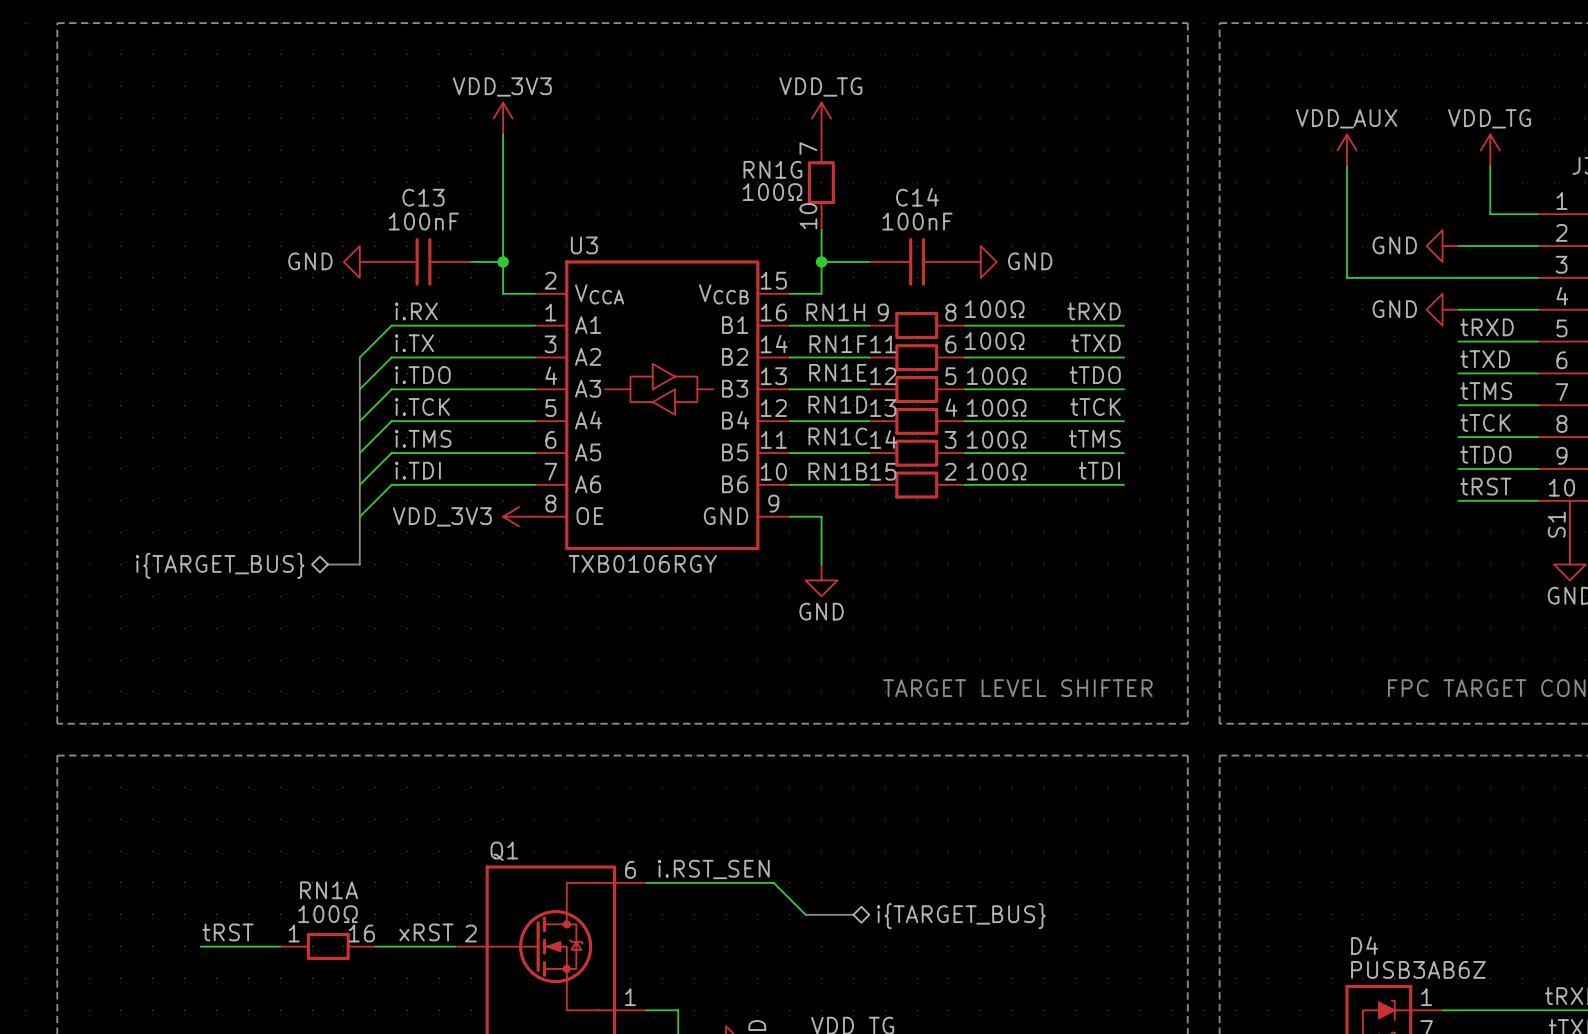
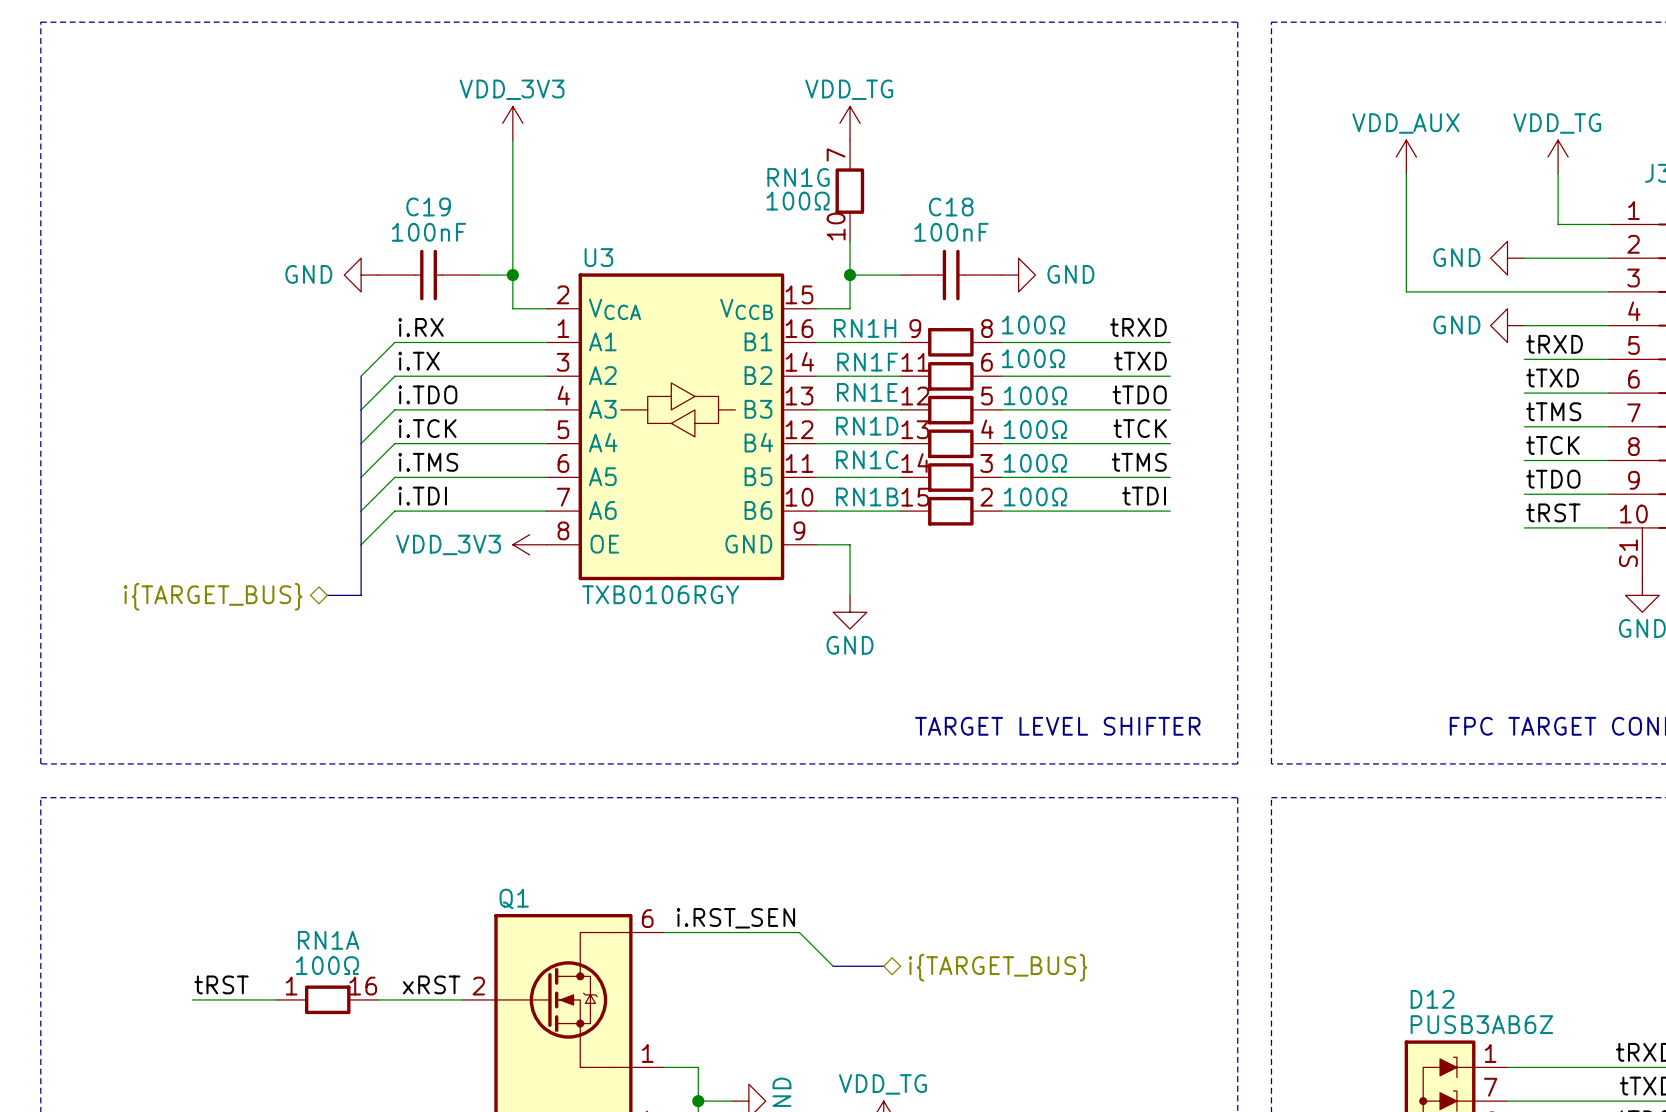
C13 name: C13 (423, 197) -> C19 (428, 206)
C14 name: C14 (917, 197) -> C18 (951, 206)
D4 name: D4 (1364, 945) -> D12 (1432, 999)

